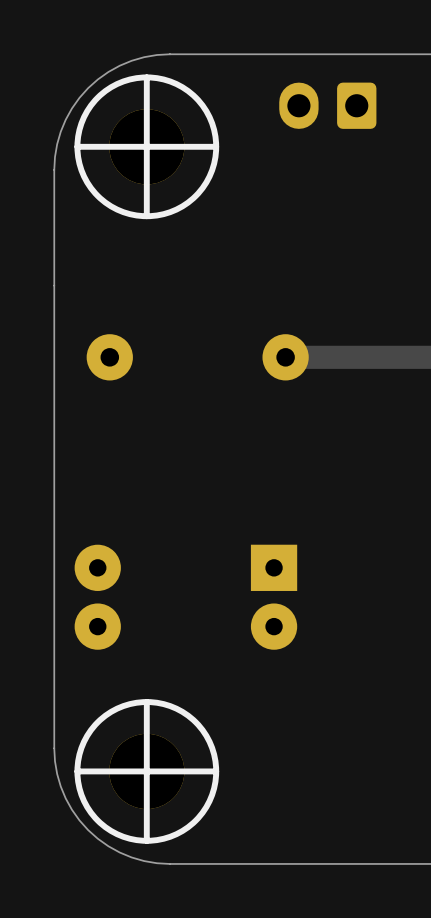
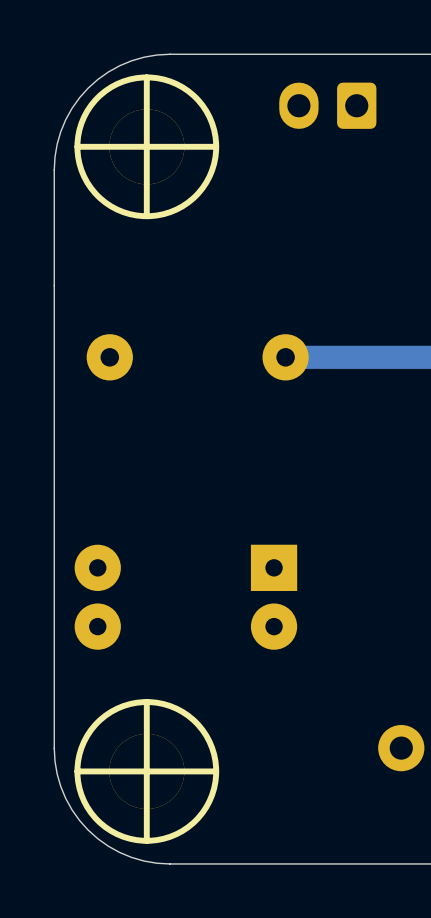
part: none -> (401, 748)

